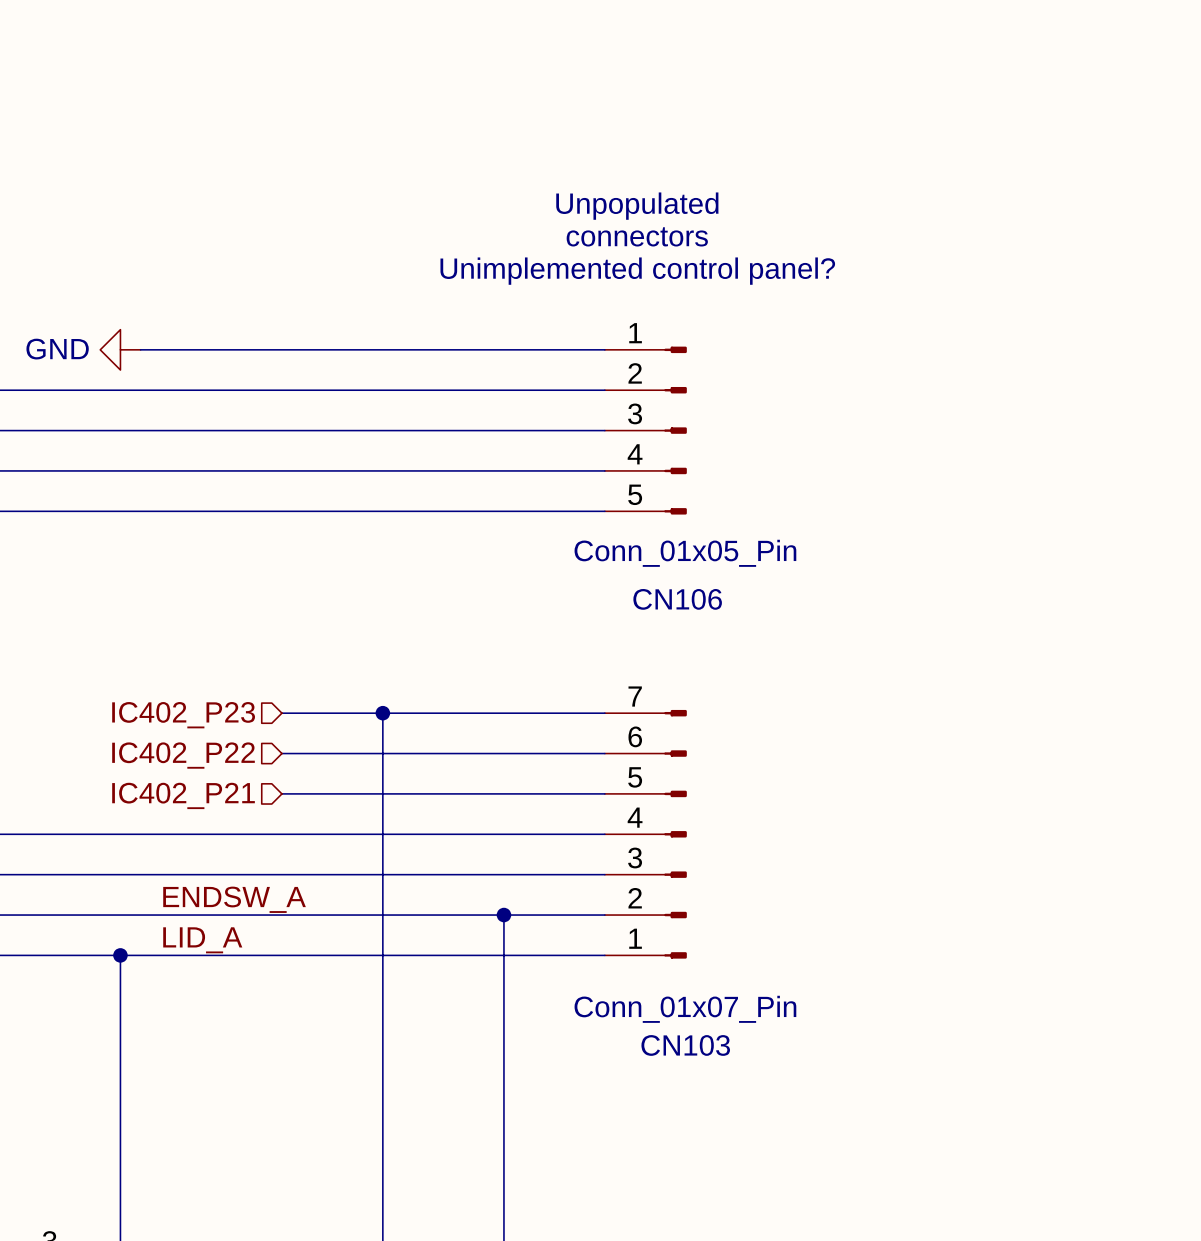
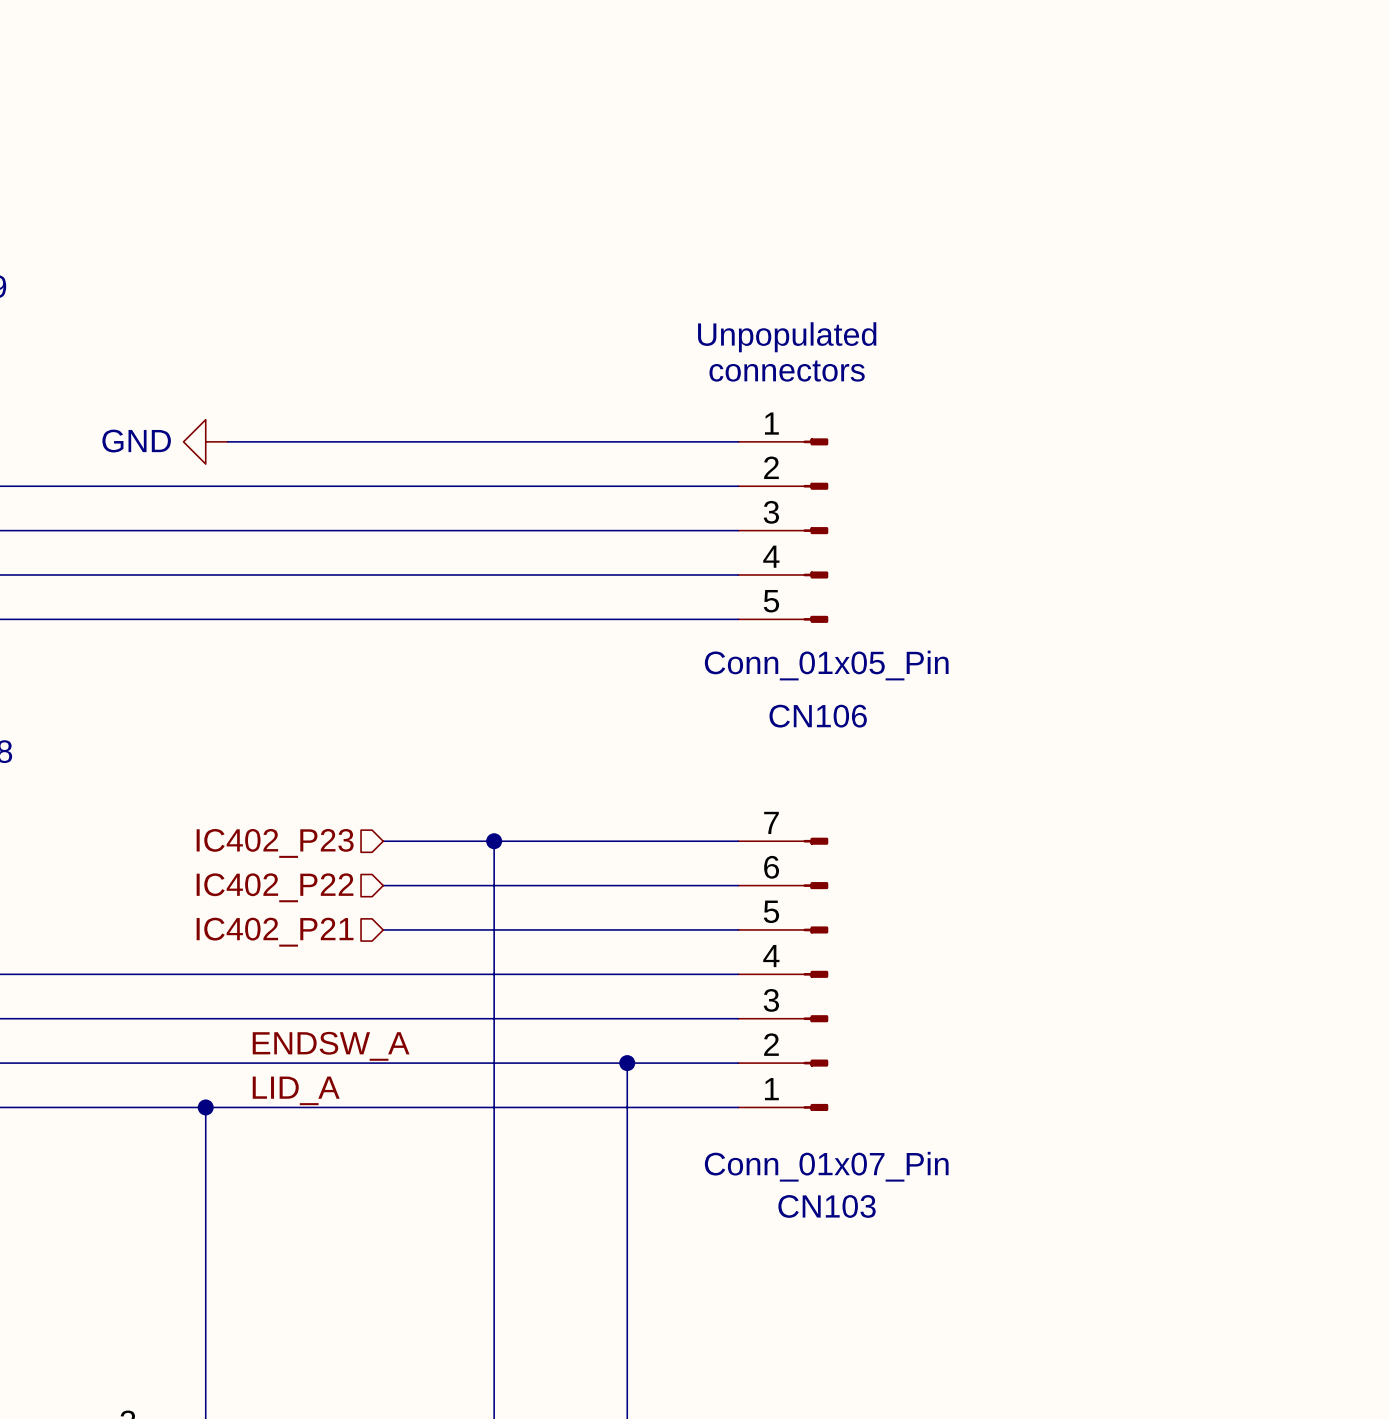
text position: Unpopulated (637, 206) -> Unpopulated (787, 337)
text position: connectors (637, 236) -> connectors (787, 371)
text: Unimplemented control panel? (637, 271) -> none

